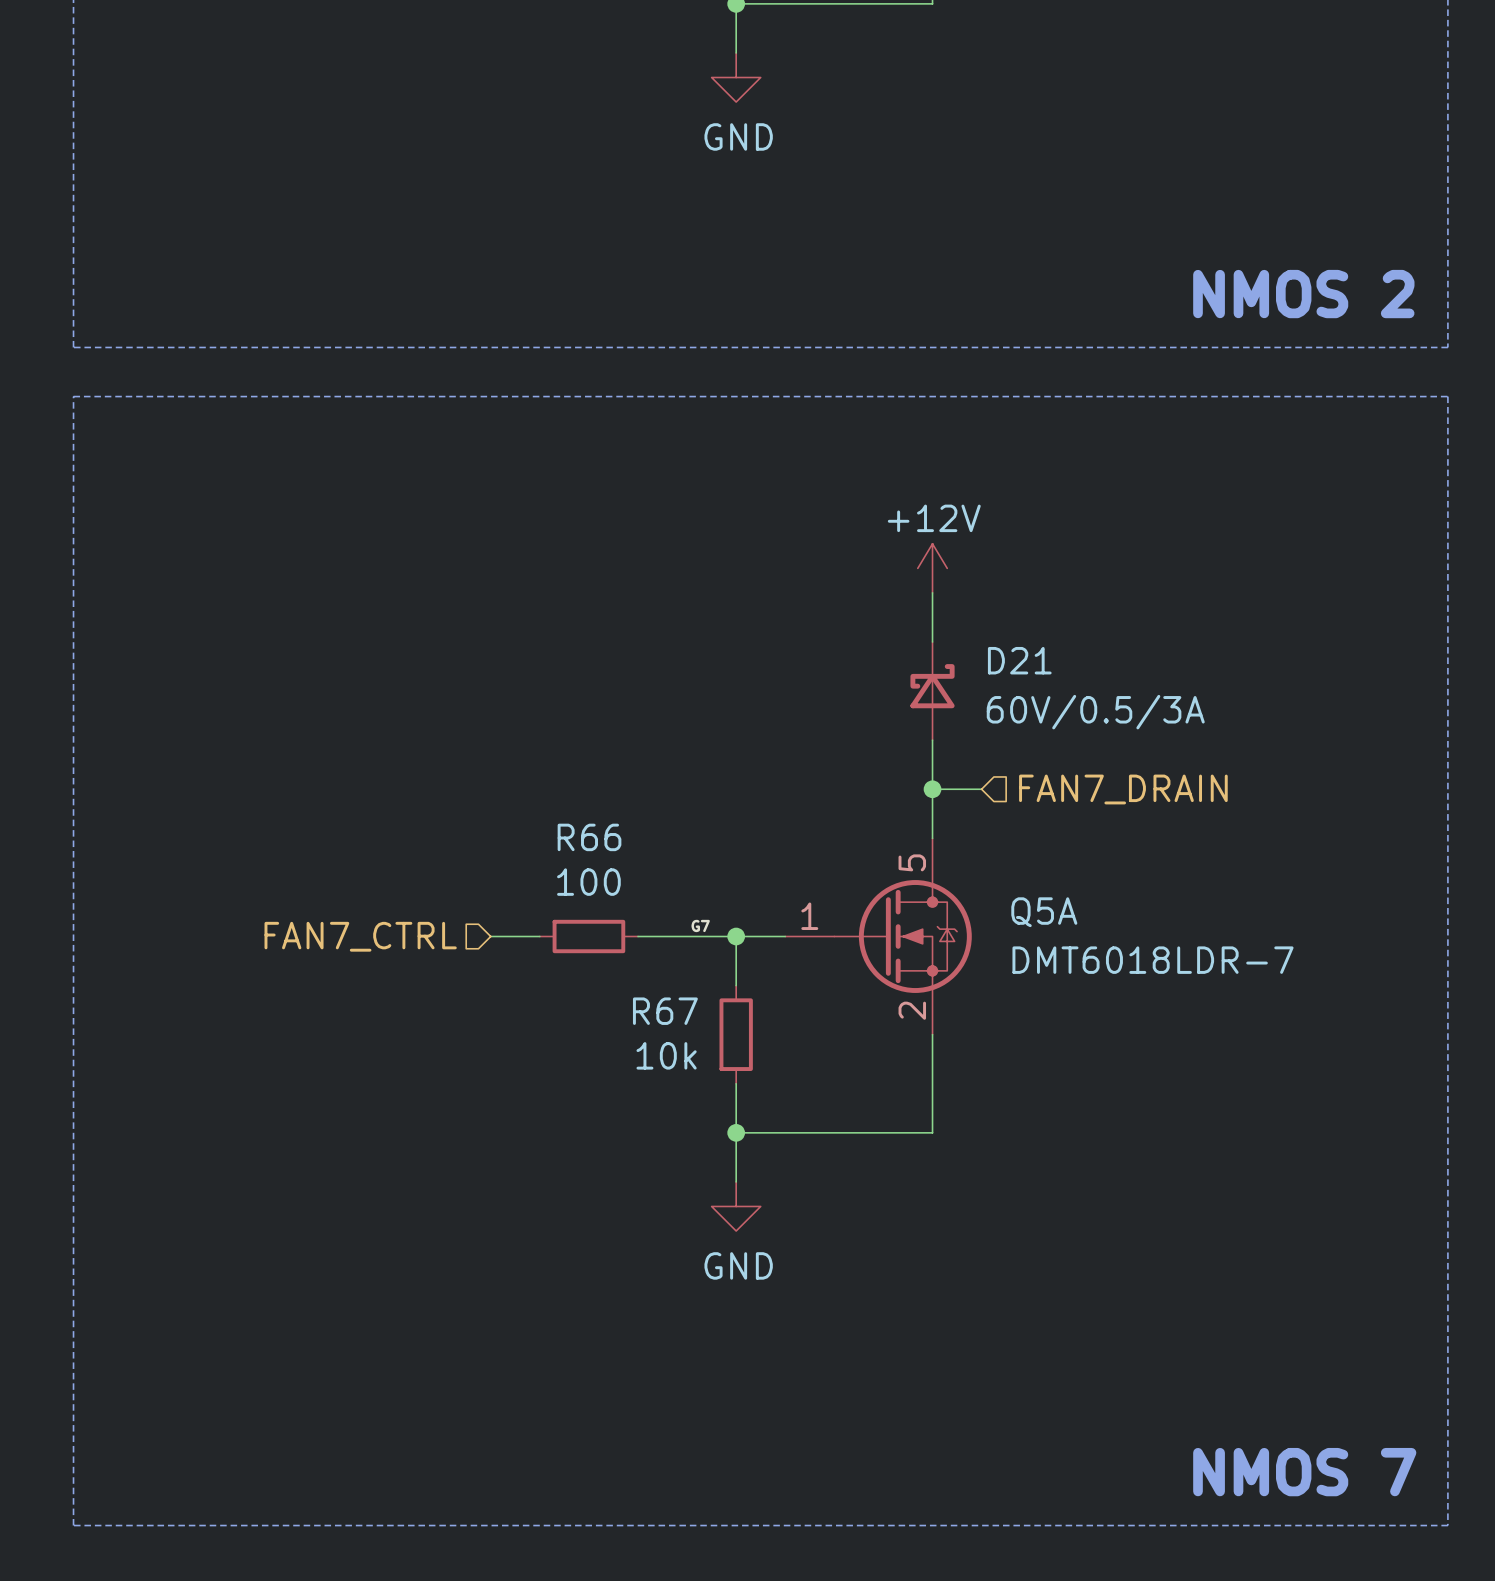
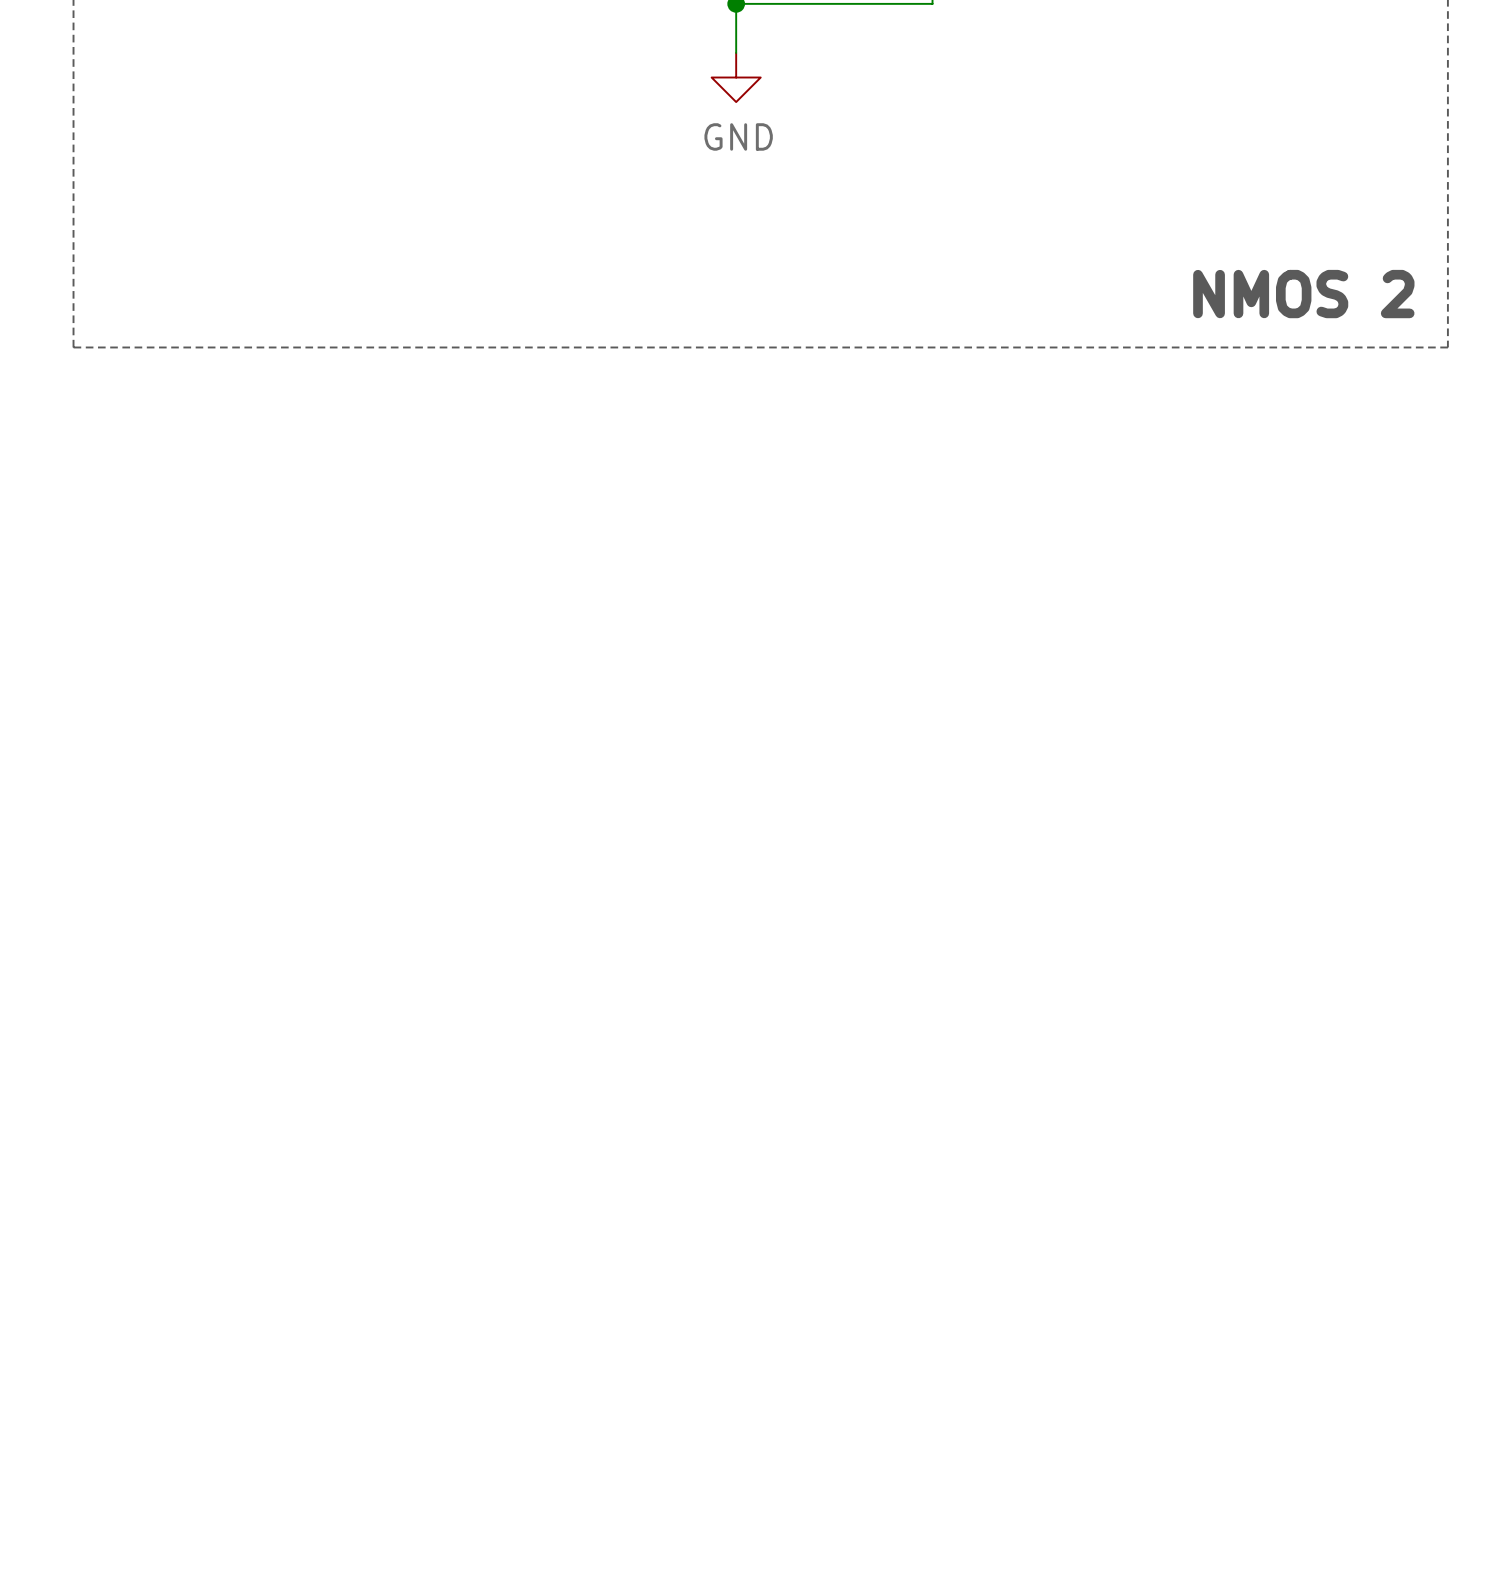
line: (73, 396) (1447, 396) (1447, 1525) (73, 1525) (73, 396) -> none
power symbol: +12V (932, 568) -> none
wire: (932, 592) (932, 641) -> none
D21: 60V/0.5/3A (932, 691) -> none
wire: (932, 740) (932, 838) -> none
wire: (932, 789) (981, 789) -> none
junction: (932, 789) -> none
hierarchical label: FAN7_DRAIN (1123, 789) -> none
label: G7 (700, 925) -> none
hierarchical label: FAN7_CTRL (360, 936) -> none
wire: (490, 936) (539, 936) -> none
R66: 100 (588, 936) -> none
wire: (638, 936) (785, 936) -> none
wire: (736, 936) (736, 985) -> none
junction: (736, 936) -> none
Q5A: DMT6018LDR-7 (878, 936) -> none
R67: 10k (736, 1034) -> none
wire: (932, 1034) (932, 1132) (736, 1132) -> none
wire: (736, 1083) (736, 1181) -> none
junction: (736, 1132) -> none
power symbol: GND (736, 1206) -> none
text: NMOS 7 (1304, 1472) -> none

